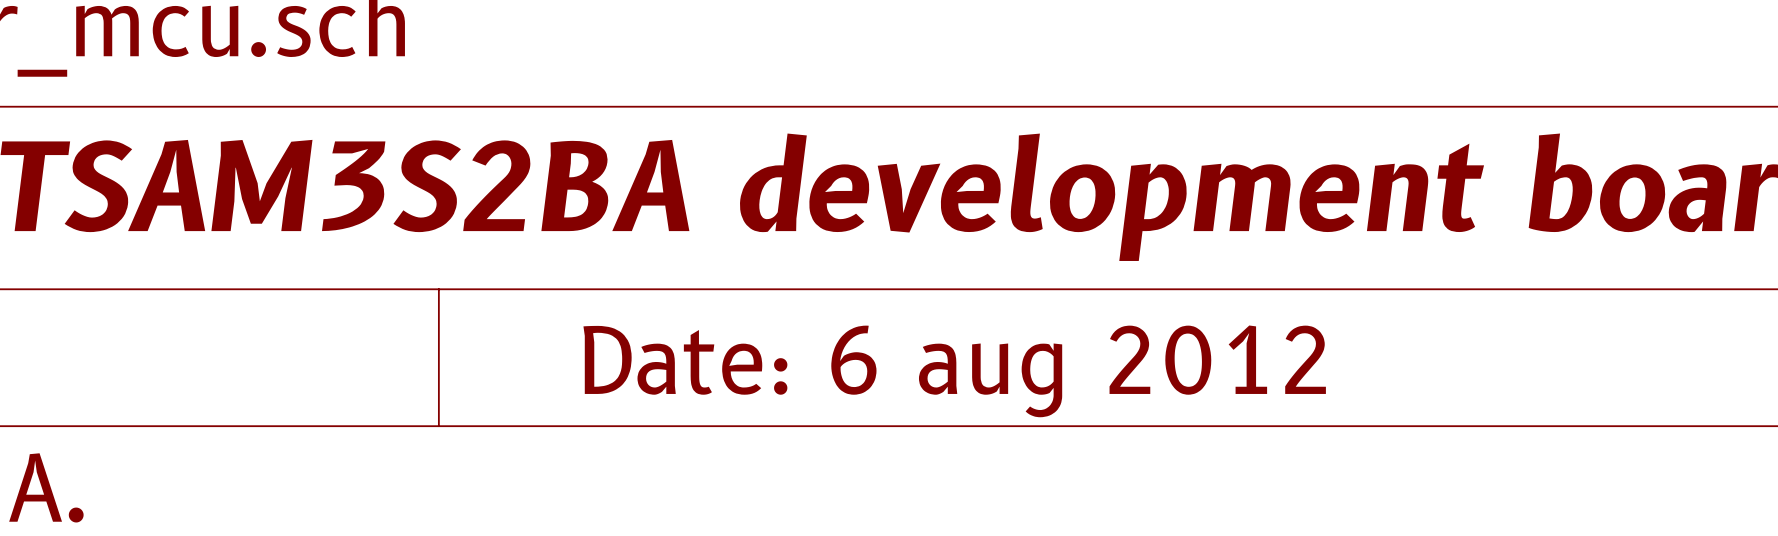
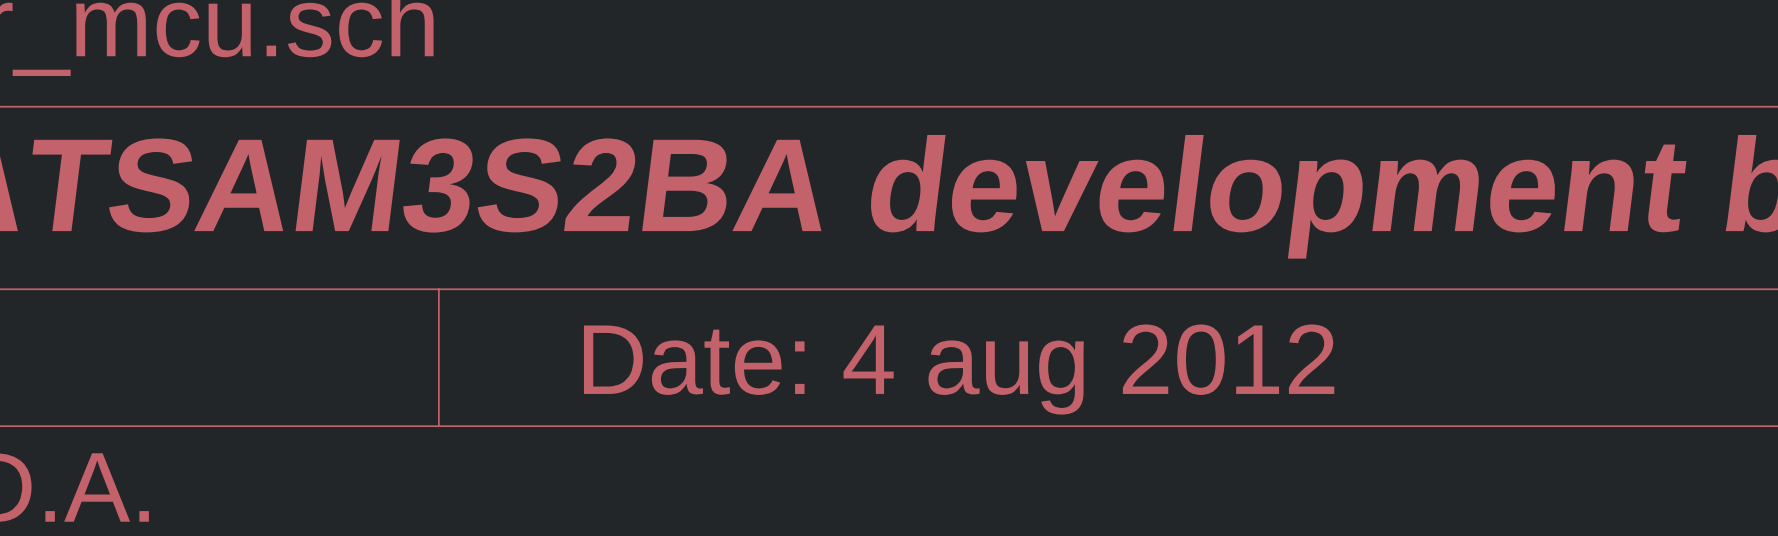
title block: Date: 6 aug 2012 (954, 371) -> Date: 4 aug 2012 (959, 369)

